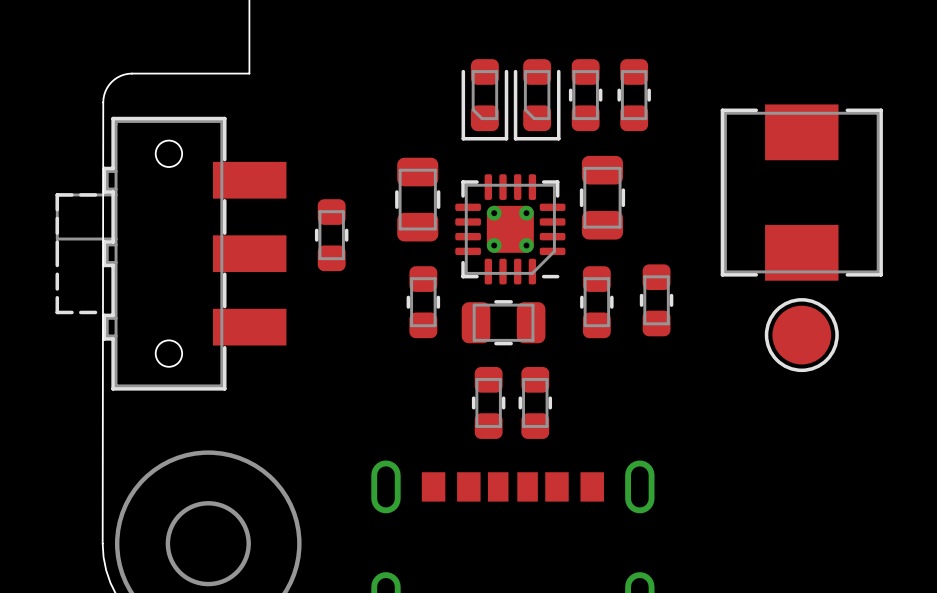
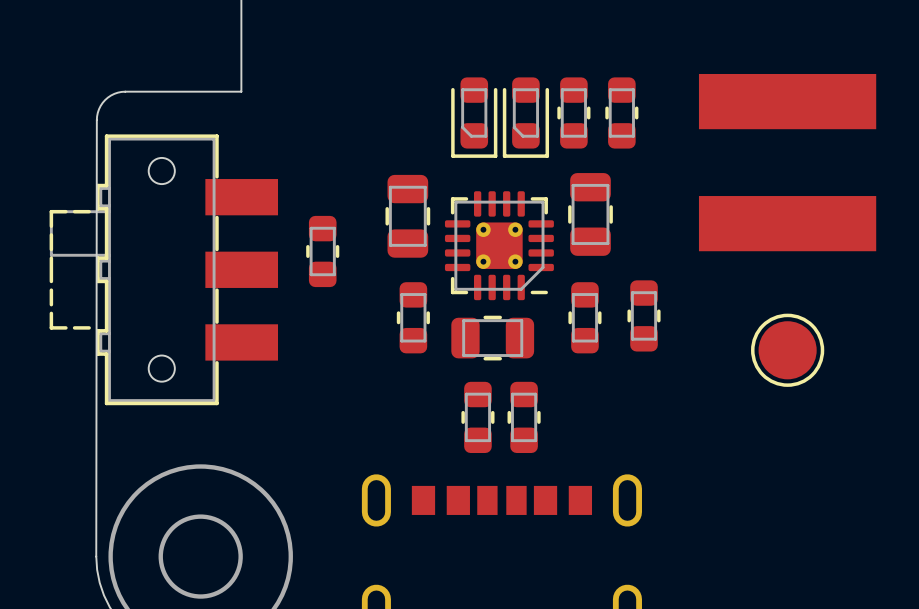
part: none -> (787, 162)
part: (801, 192) -> none

